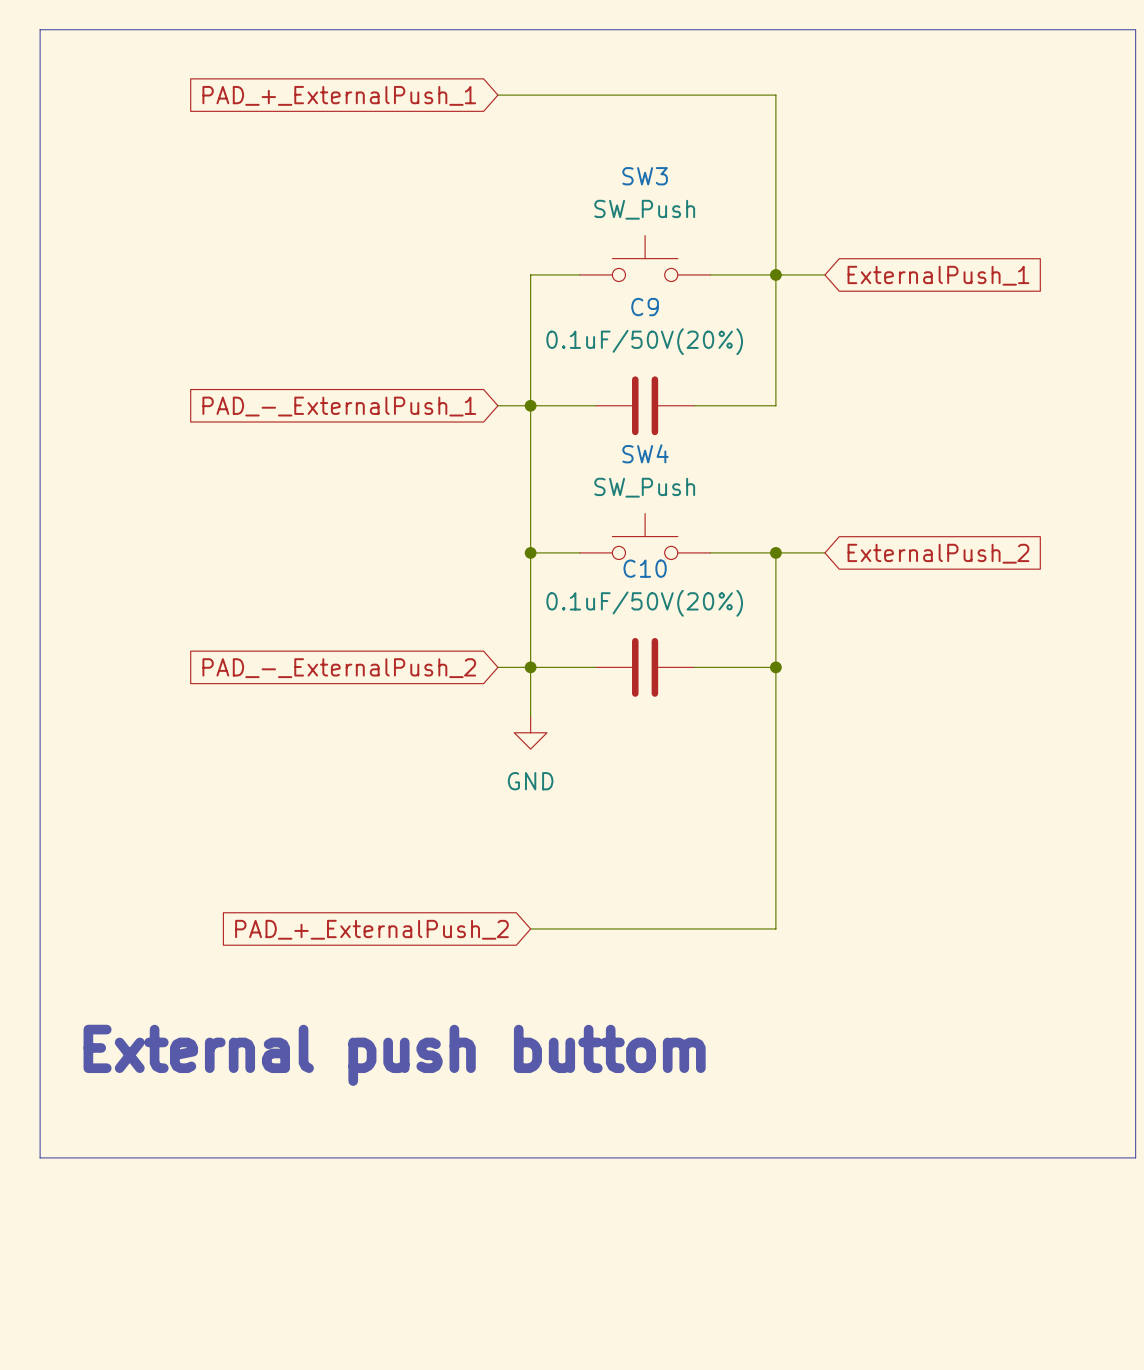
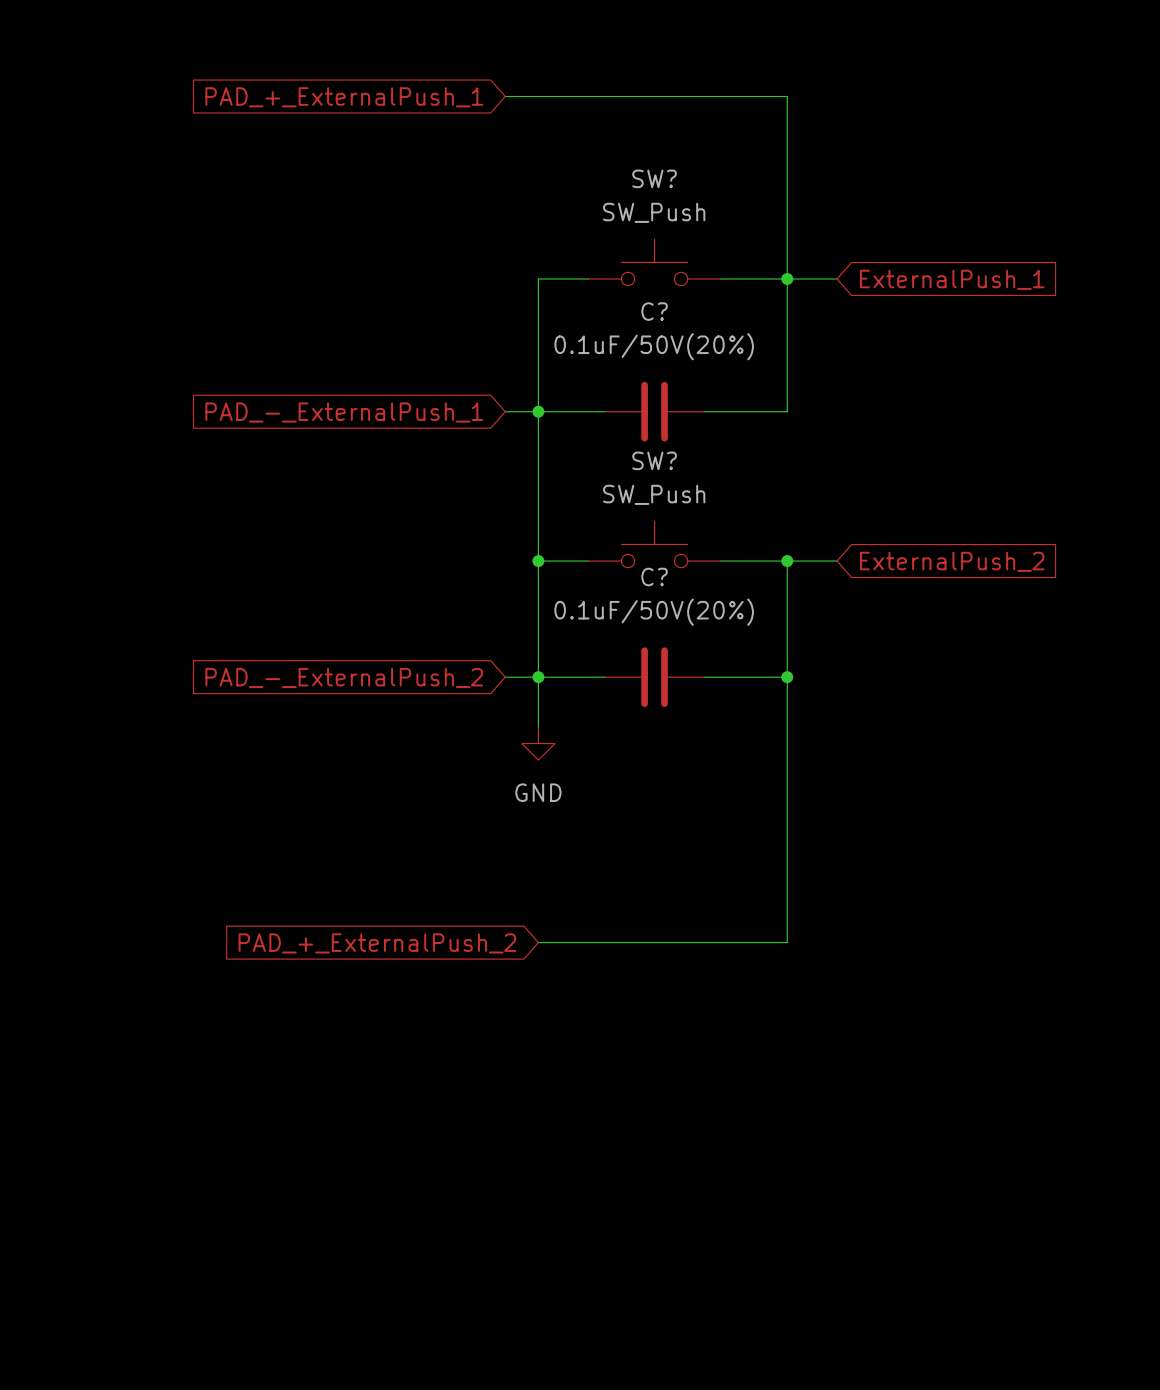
line: (40, 29) (1135, 29) (1135, 1157) (40, 1157) (40, 29) -> none
SW3 name: SW3 (645, 176) -> SW? (654, 178)
C9 name: C9 (645, 307) -> C? (654, 311)
SW4 name: SW4 (645, 453) -> SW? (654, 460)
C10 name: C10 (645, 568) -> C? (654, 577)
text: External push buttom (394, 1055) -> none

